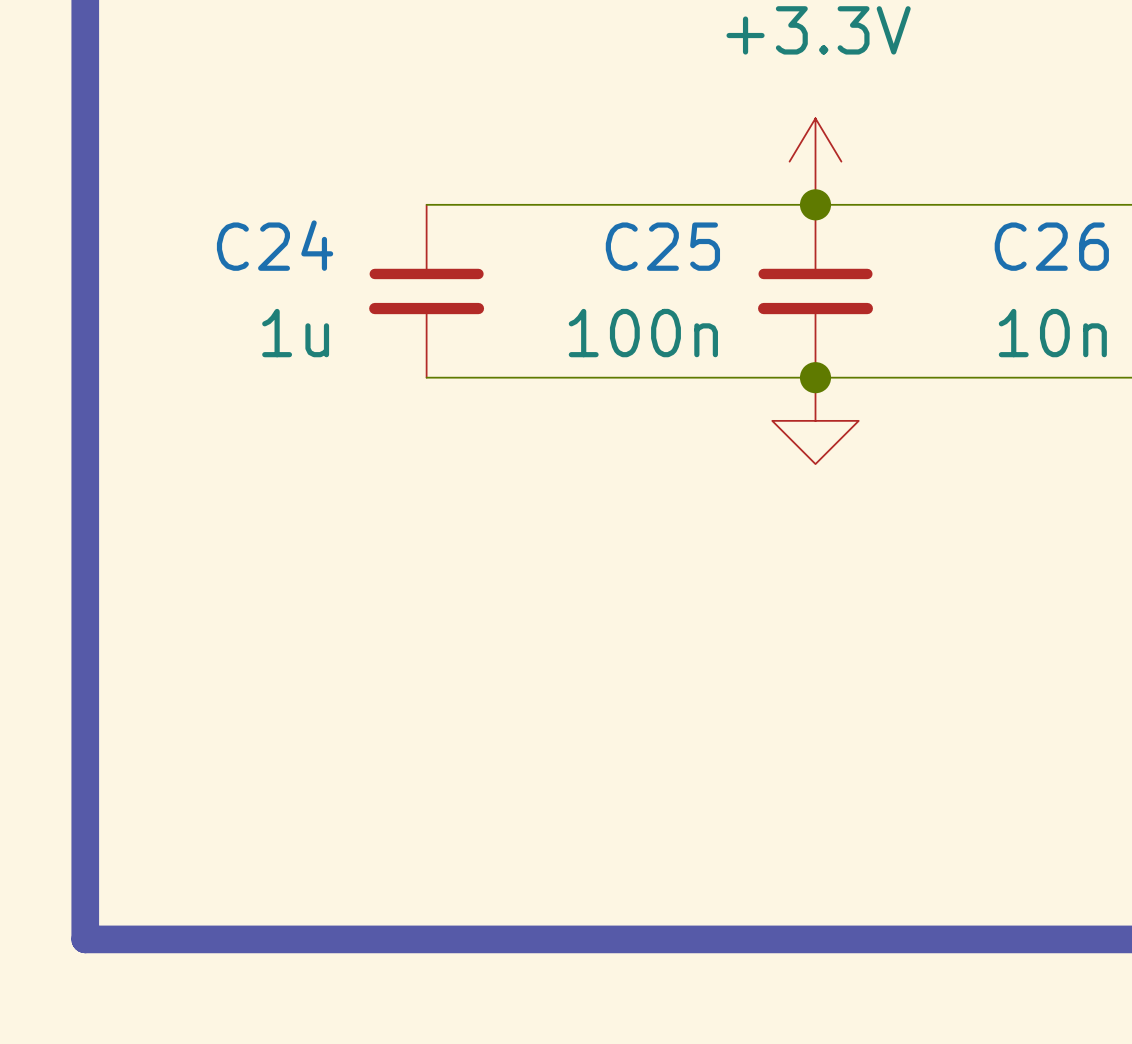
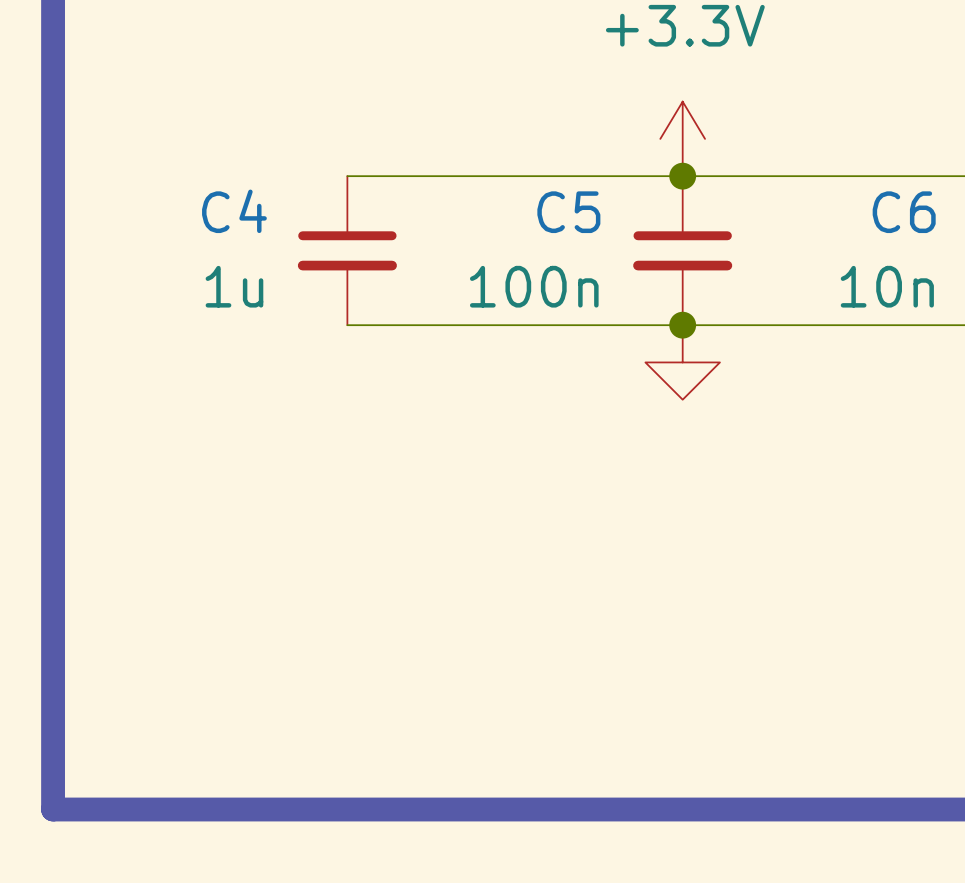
C24 name: C24 (275, 245) -> C4 (234, 211)
C25 name: C25 (662, 246) -> C5 (568, 212)
C26 name: C26 (1051, 246) -> C6 (904, 212)

